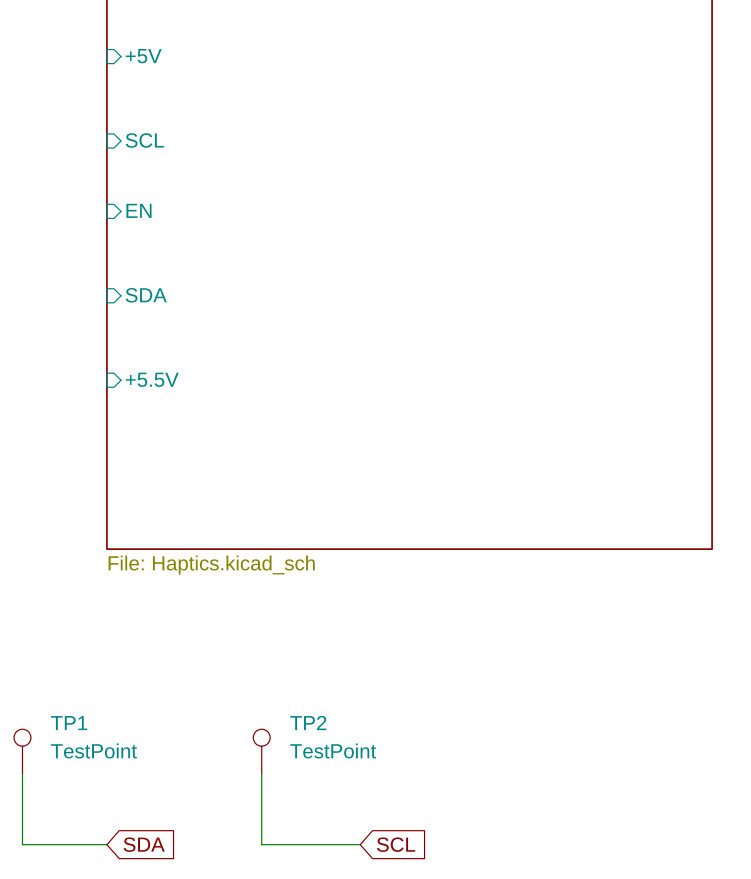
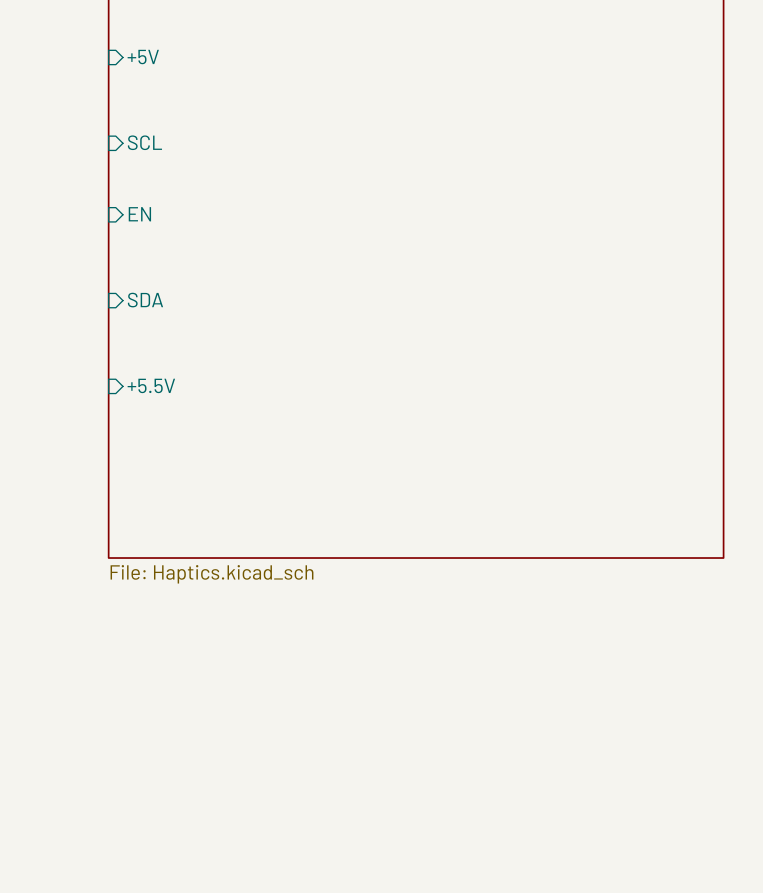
TP1: TestPoint (22, 751) -> none
TP2: TestPoint (261, 751) -> none
wire: (22, 774) (22, 844) (106, 844) -> none
wire: (261, 774) (261, 844) (360, 844) -> none
global label: SDA (144, 844) -> none
global label: SCL (396, 844) -> none

